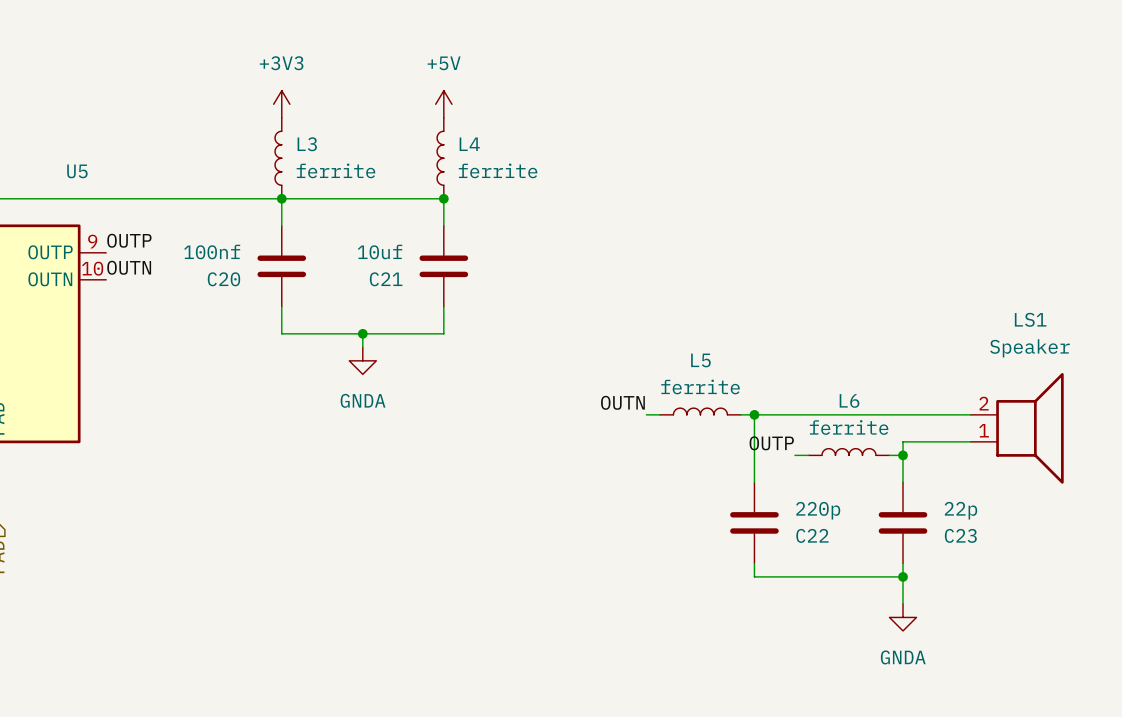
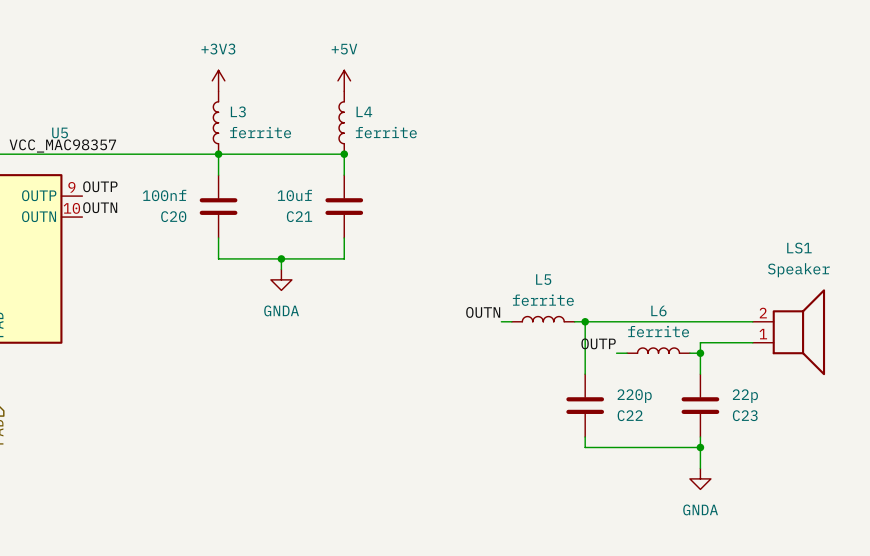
label: none -> VCC_MAC98357 (62, 146)

